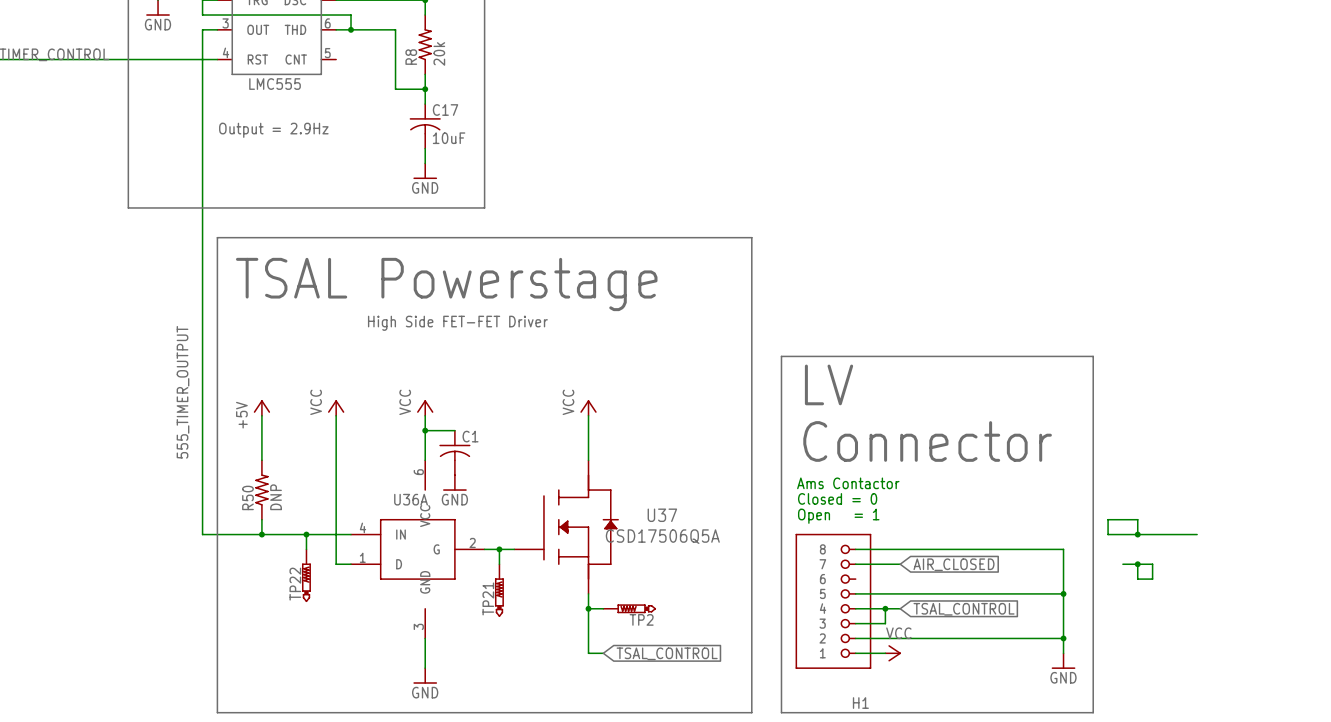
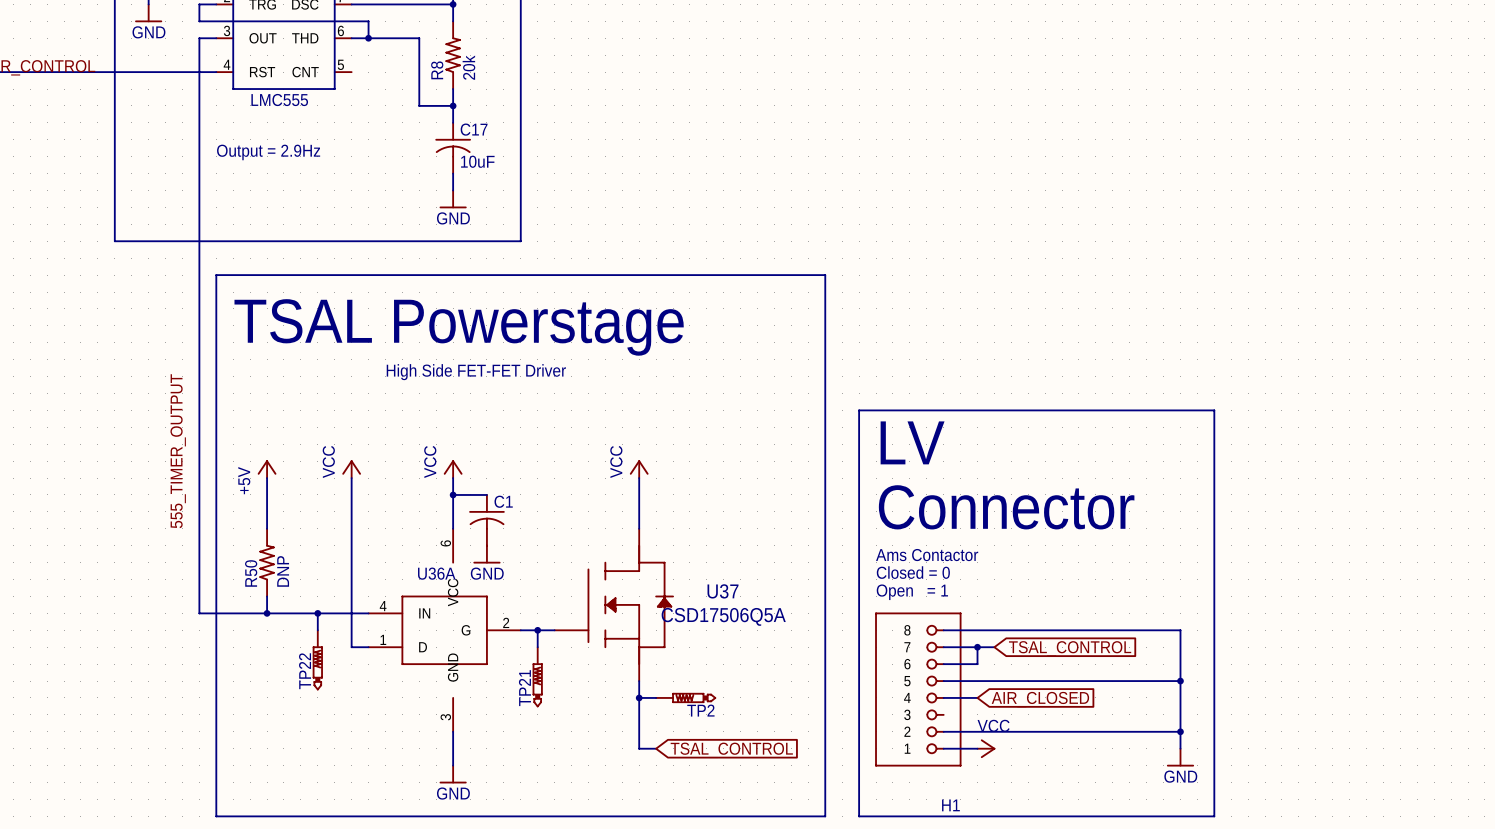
wire: (1137, 534) (1137, 519) (1108, 519) (1108, 534) (1197, 534) -> none
junction: (1137, 534) -> none
wire: none -> (977, 647) (977, 664) (943, 664)
junction: none -> (977, 647)
global label: AIR_CLOSED (954, 564) -> TSAL_CONTROL (1070, 648)
wire: (1122, 564) (1152, 564) (1152, 579) (1137, 579) (1137, 564) -> none
junction: (1137, 564) -> none
junction: (885, 608) -> none
wire: (900, 608) (885, 608) (885, 623) (855, 623) -> none
global label: none -> AIR_CLOSED (1040, 699)
global label: TSAL_CONTROL (964, 609) -> none

